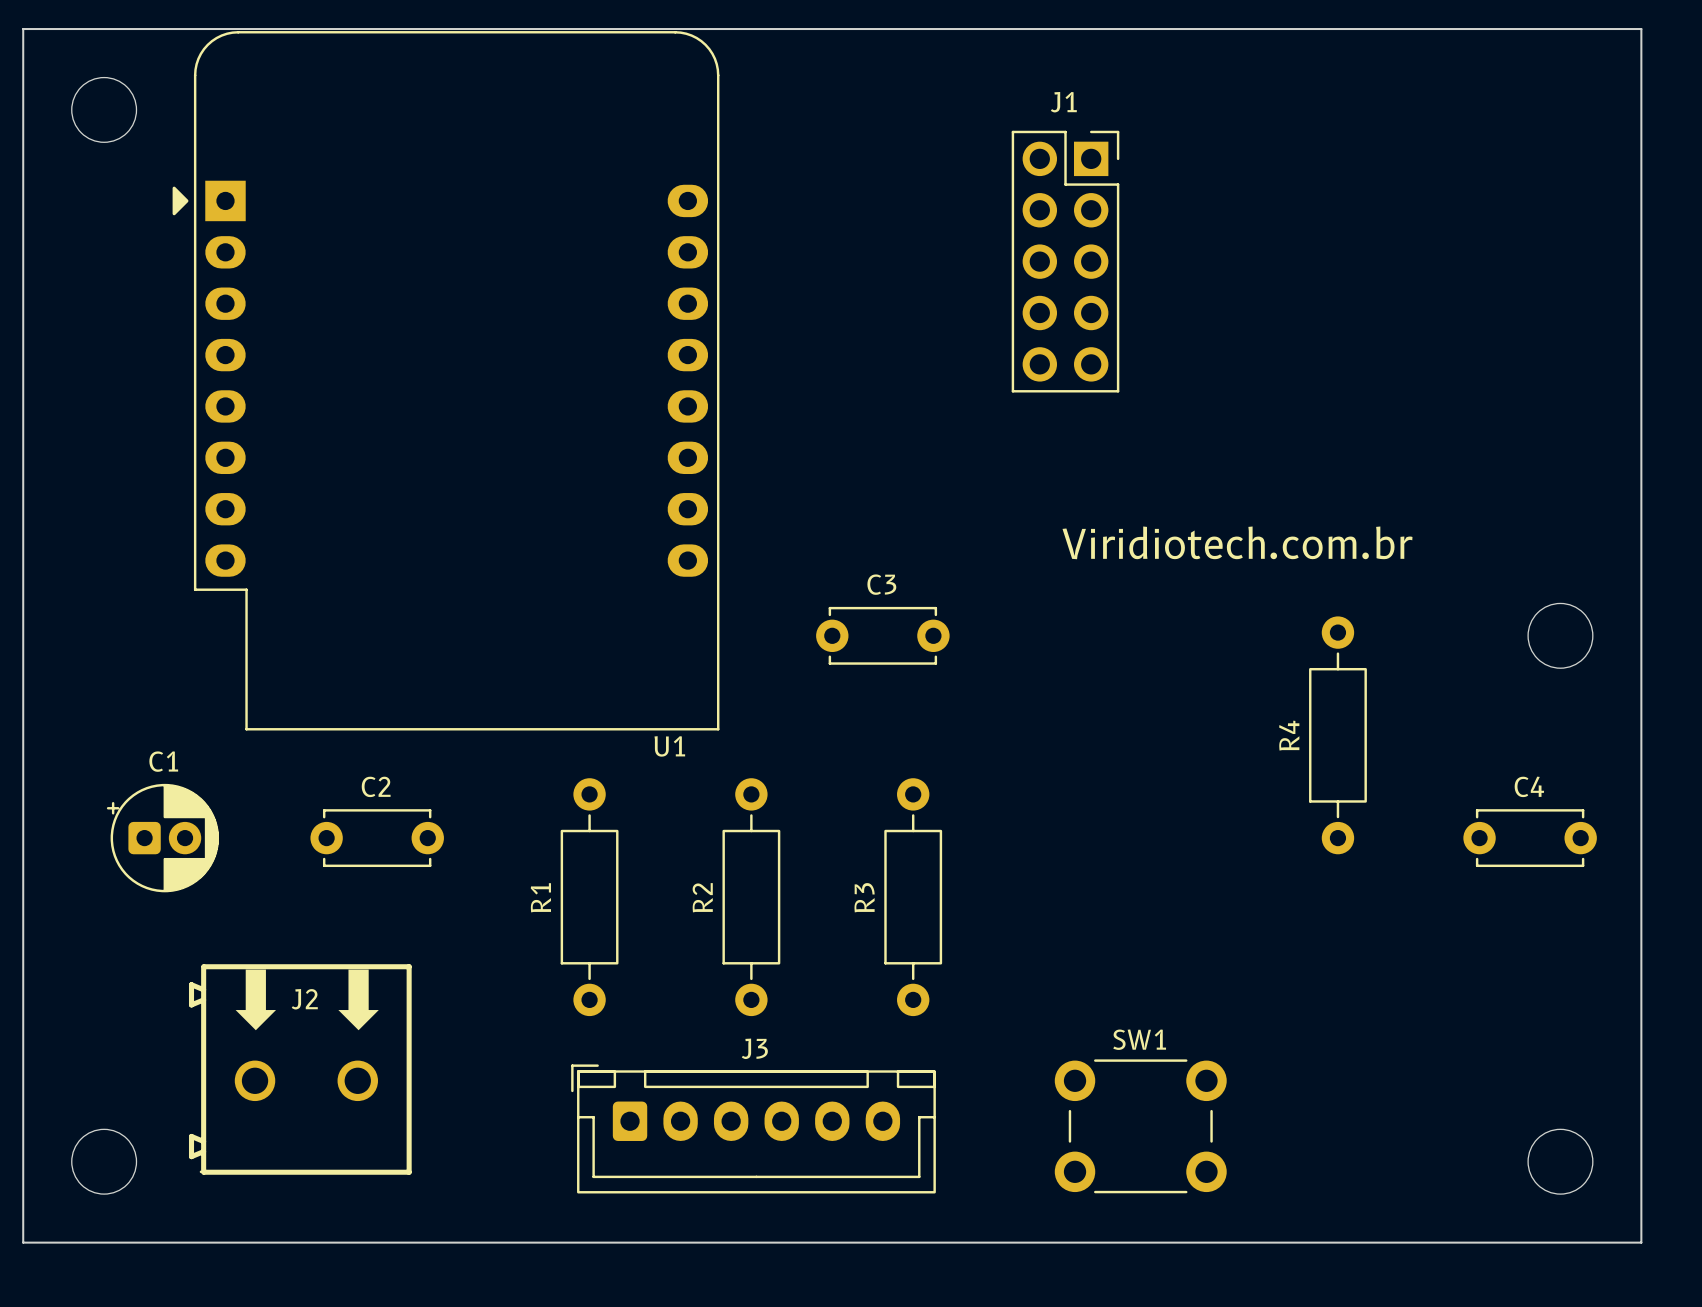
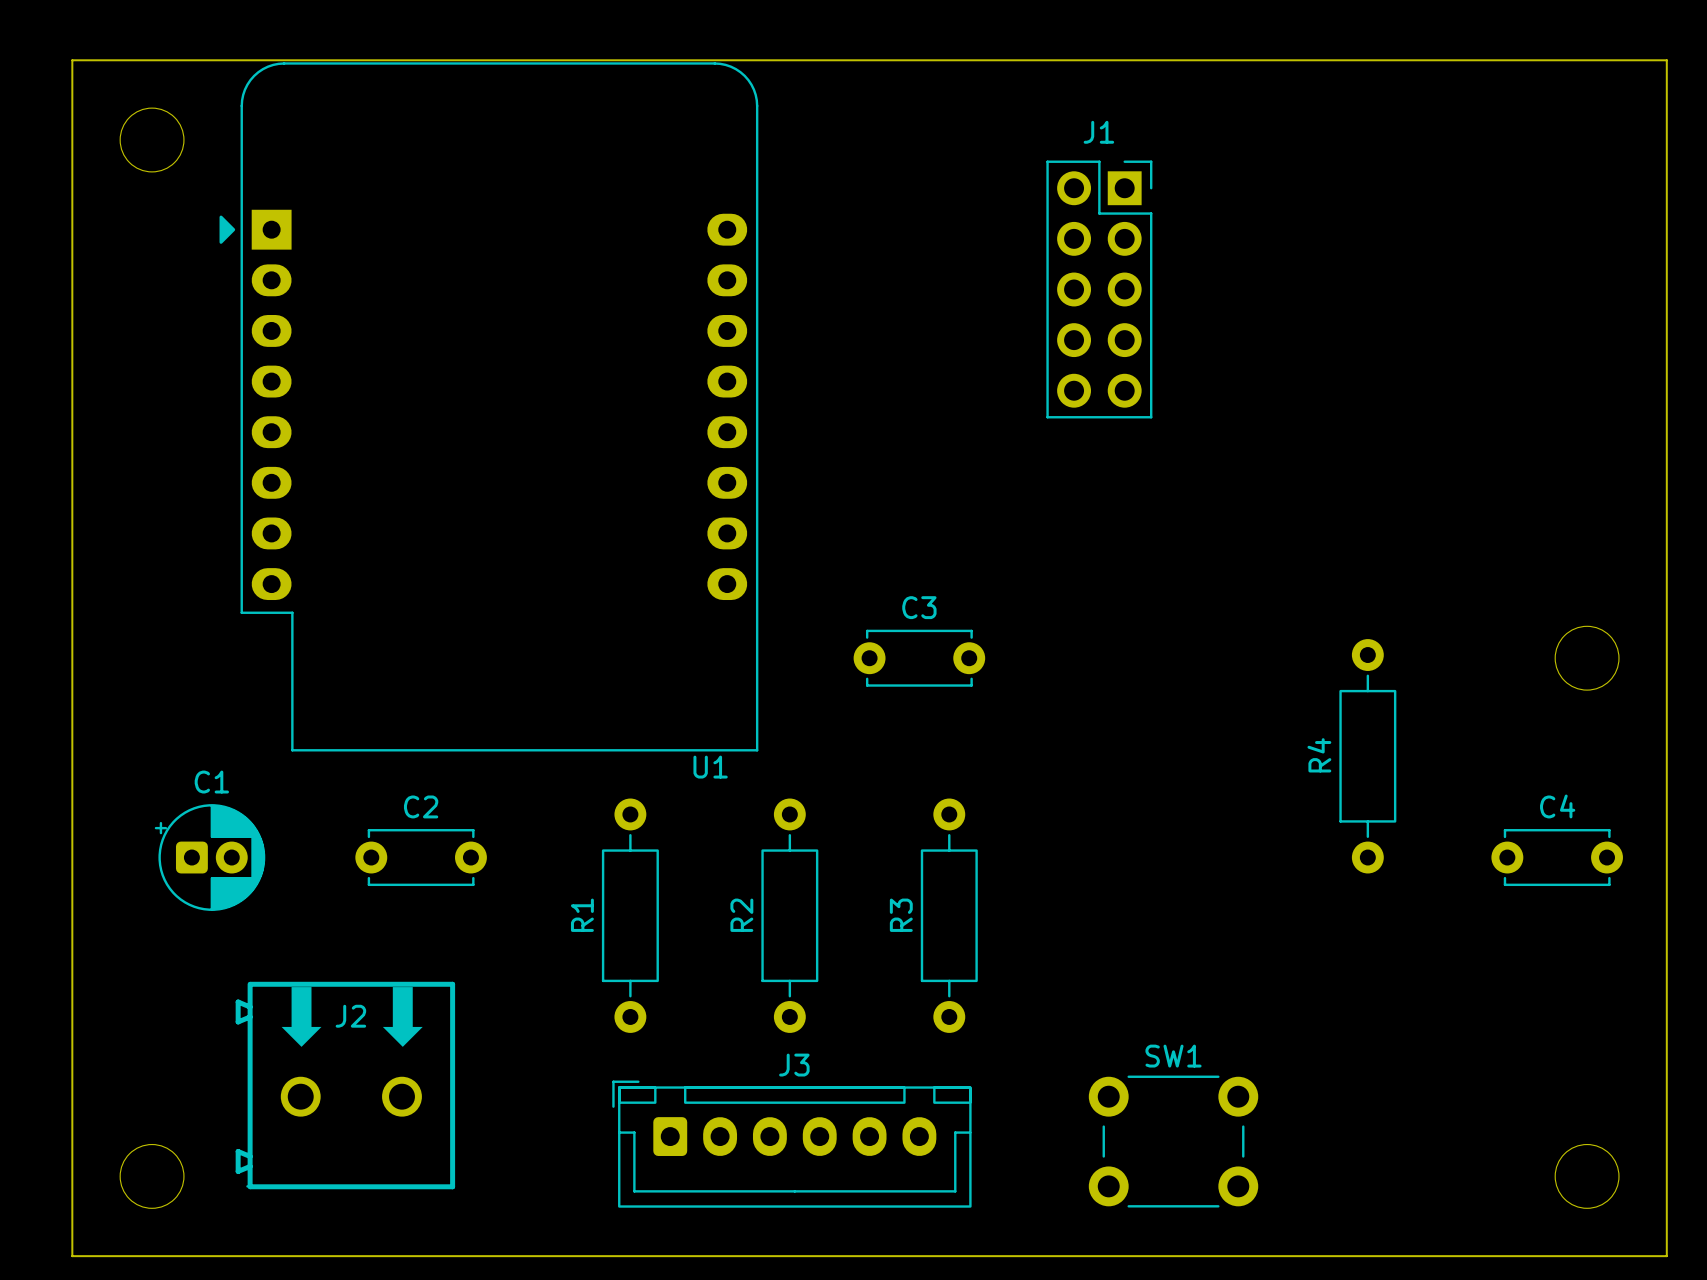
text: Viridiotech.com.br (1237, 542) -> none

